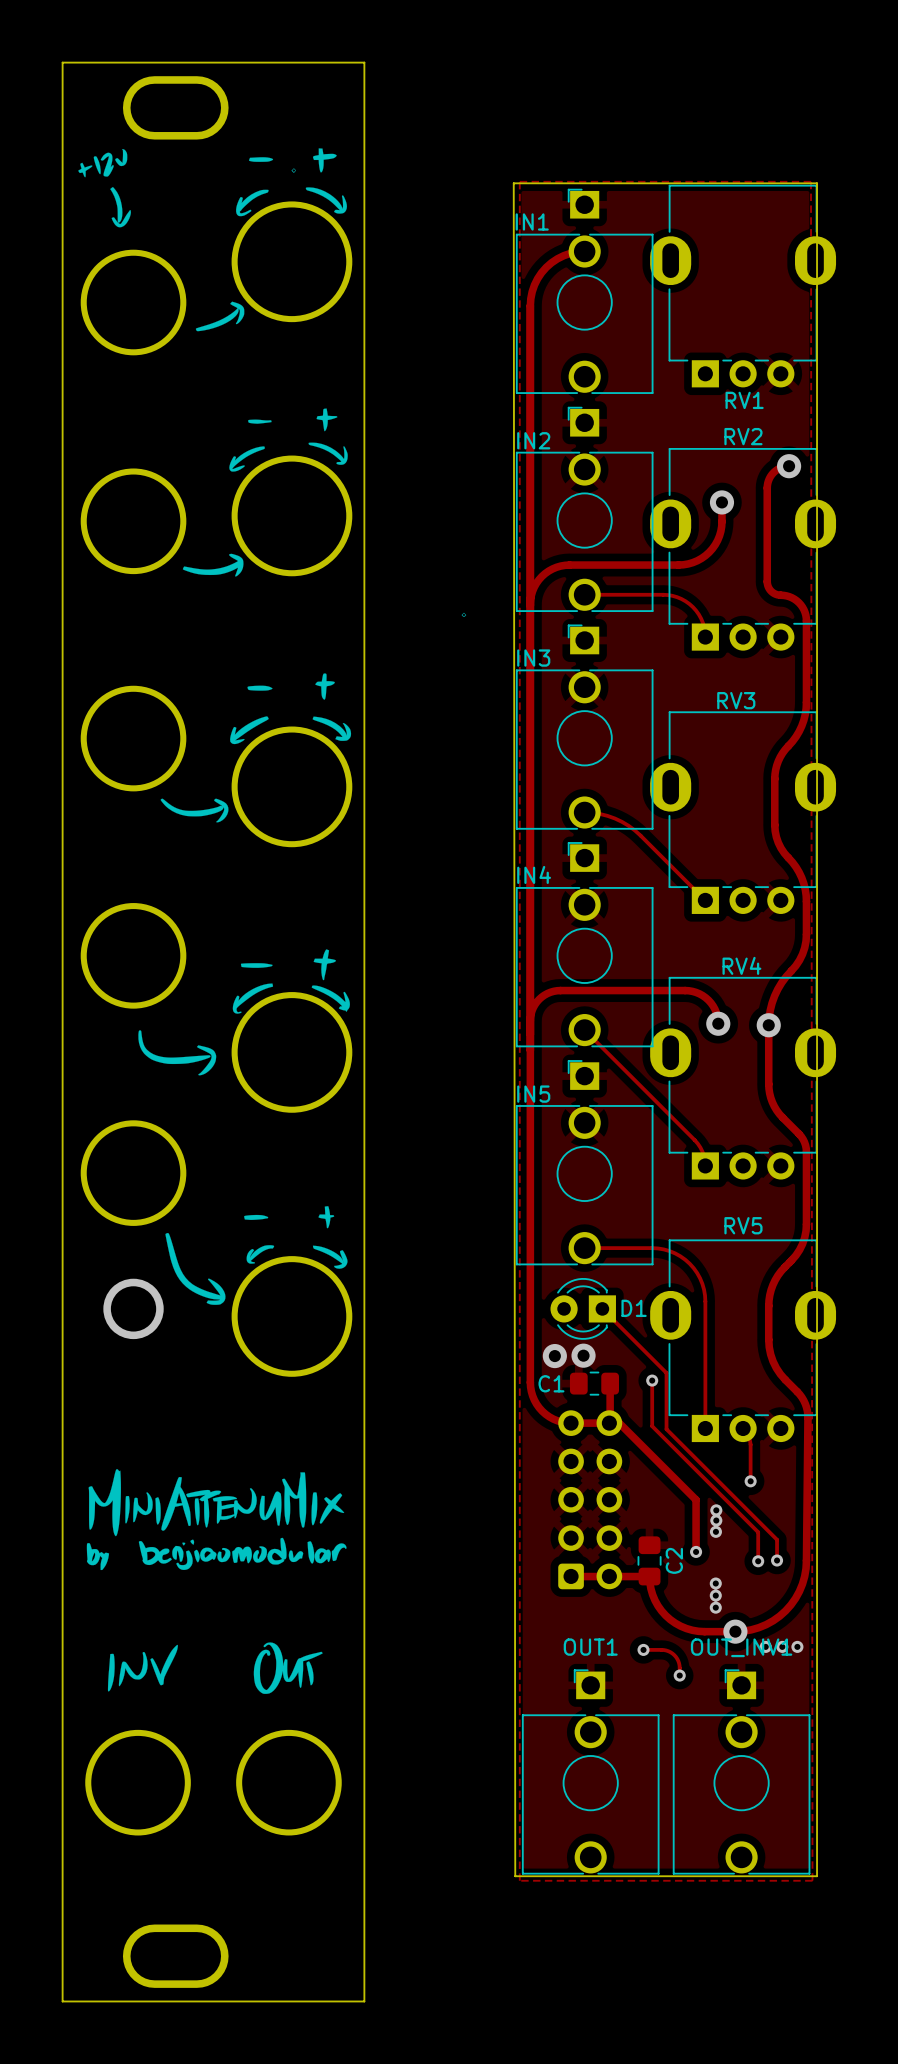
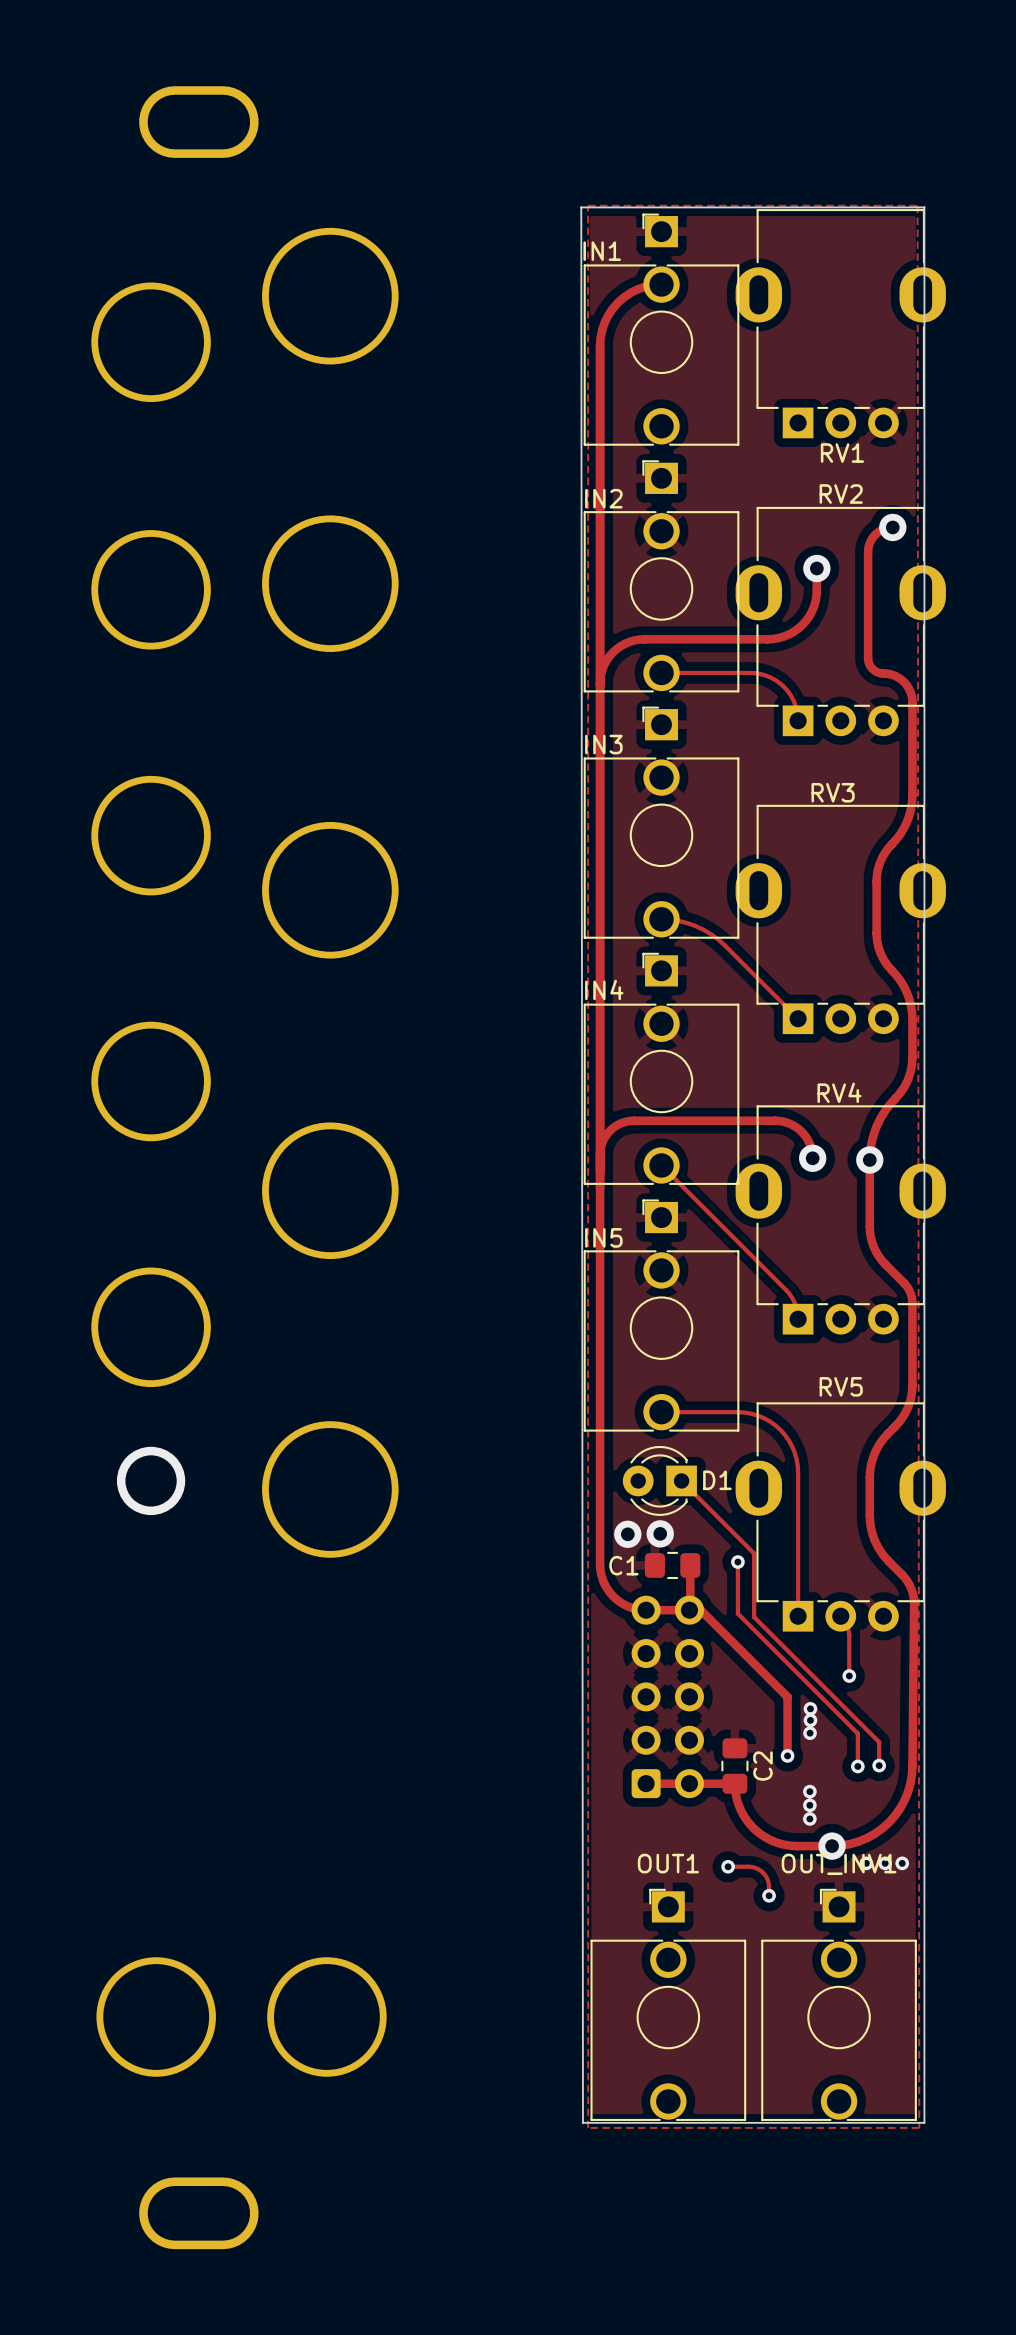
board edge: (62, 62) (62, 2001) (364, 2001) (364, 62) (62, 62) -> none
drawing: [78, 148, 467, 1694] -> none

